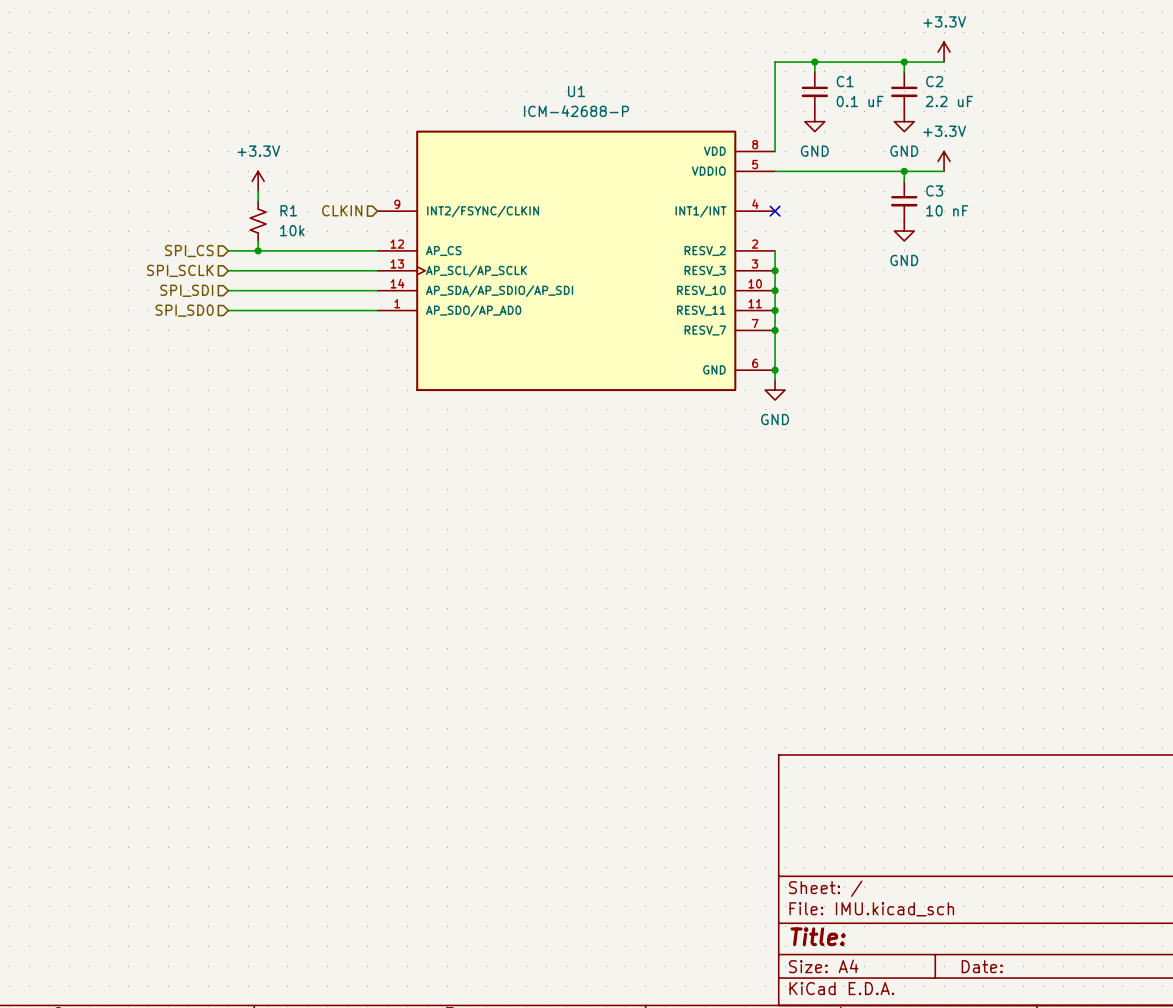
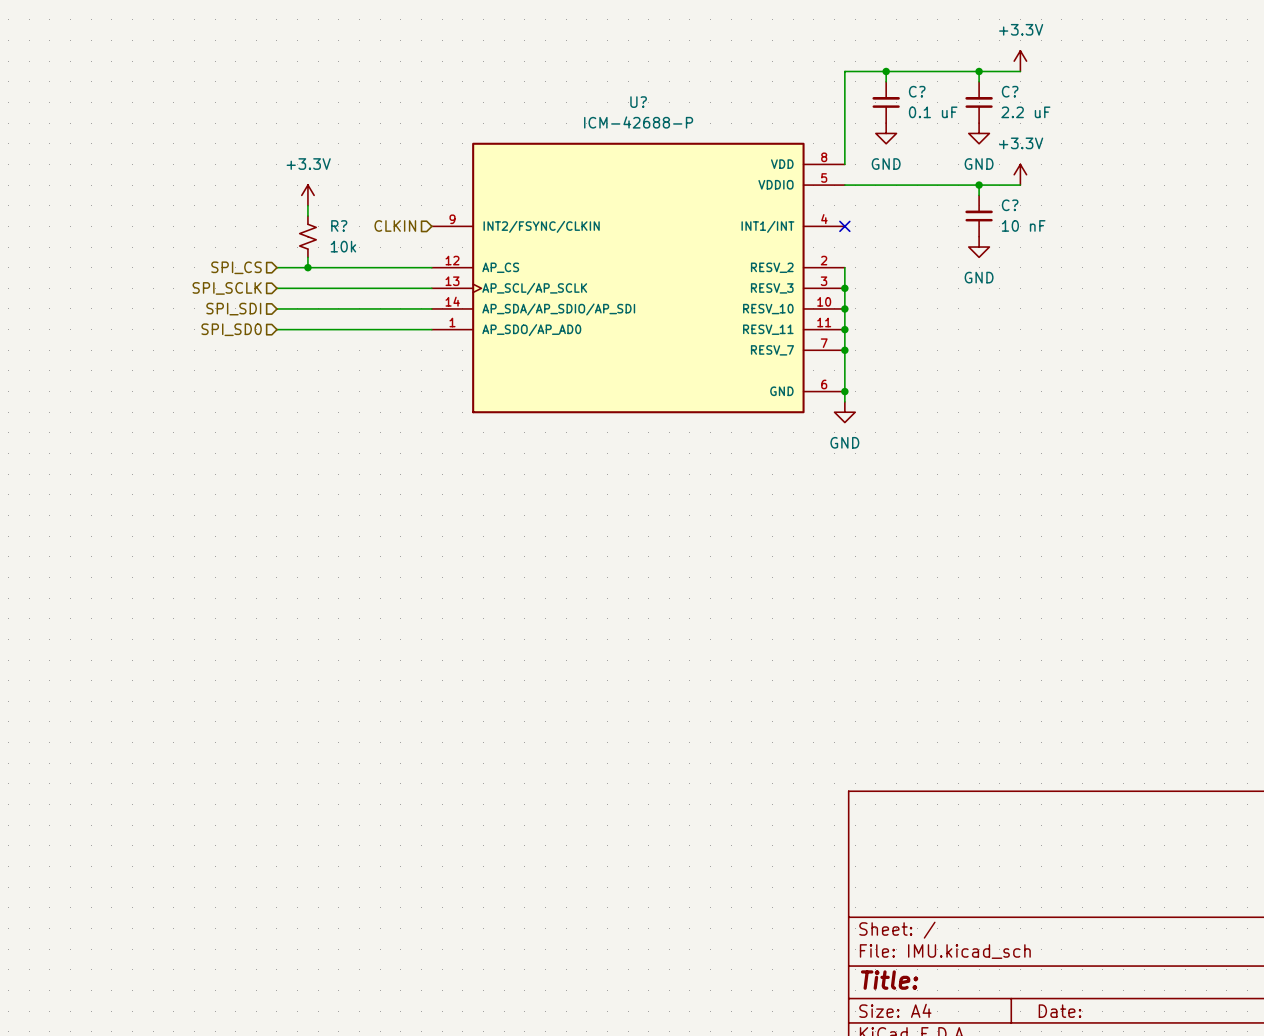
U1 name: U1 (576, 91) -> U? (638, 102)
C1: 0.1 uF (814, 91) -> none
C?: none -> 0.1 uF (886, 102)
C2: 2.2 uF (904, 91) -> none
C?: none -> 2.2 uF (979, 102)
C3: 10 nF (904, 201) -> none
C?: none -> 10 nF (979, 216)
R1 name: R1 (288, 210) -> R? (339, 225)

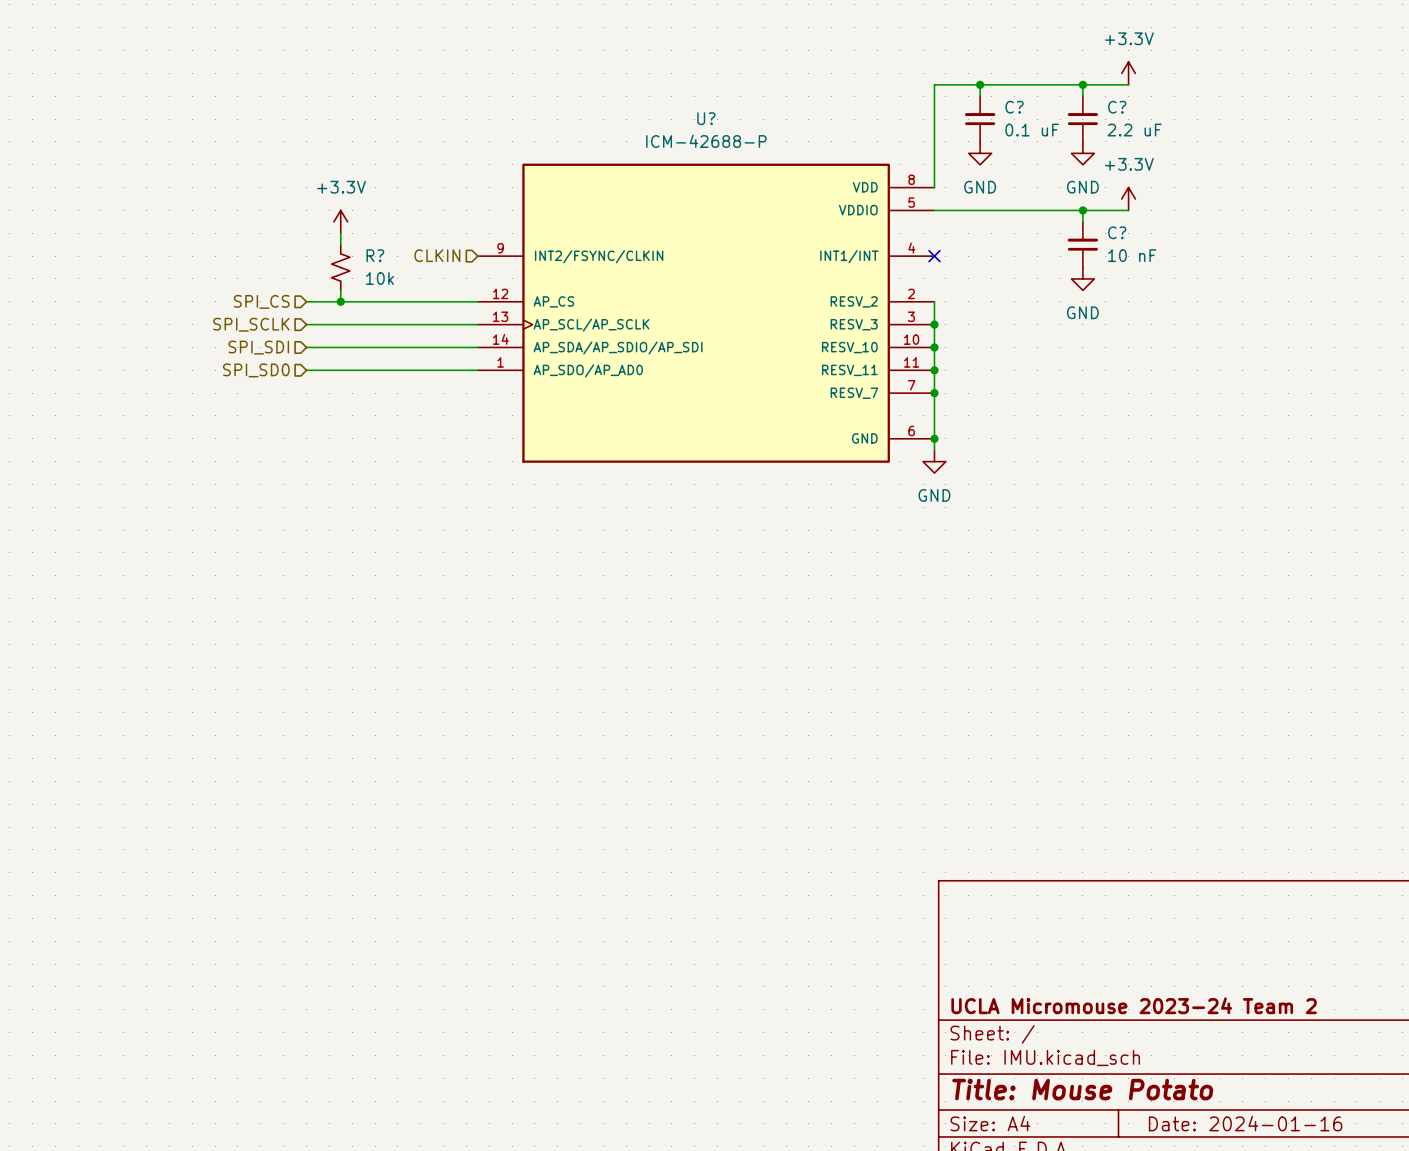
title block: none -> UCLA Micromouse 2023-24 Team 2 (1134, 1005)
title block: Title: (889, 980) -> Title: Mouse Potato (1082, 1089)
title block: Date: (1060, 1011) -> Date: 2024-01-16 (1245, 1123)

